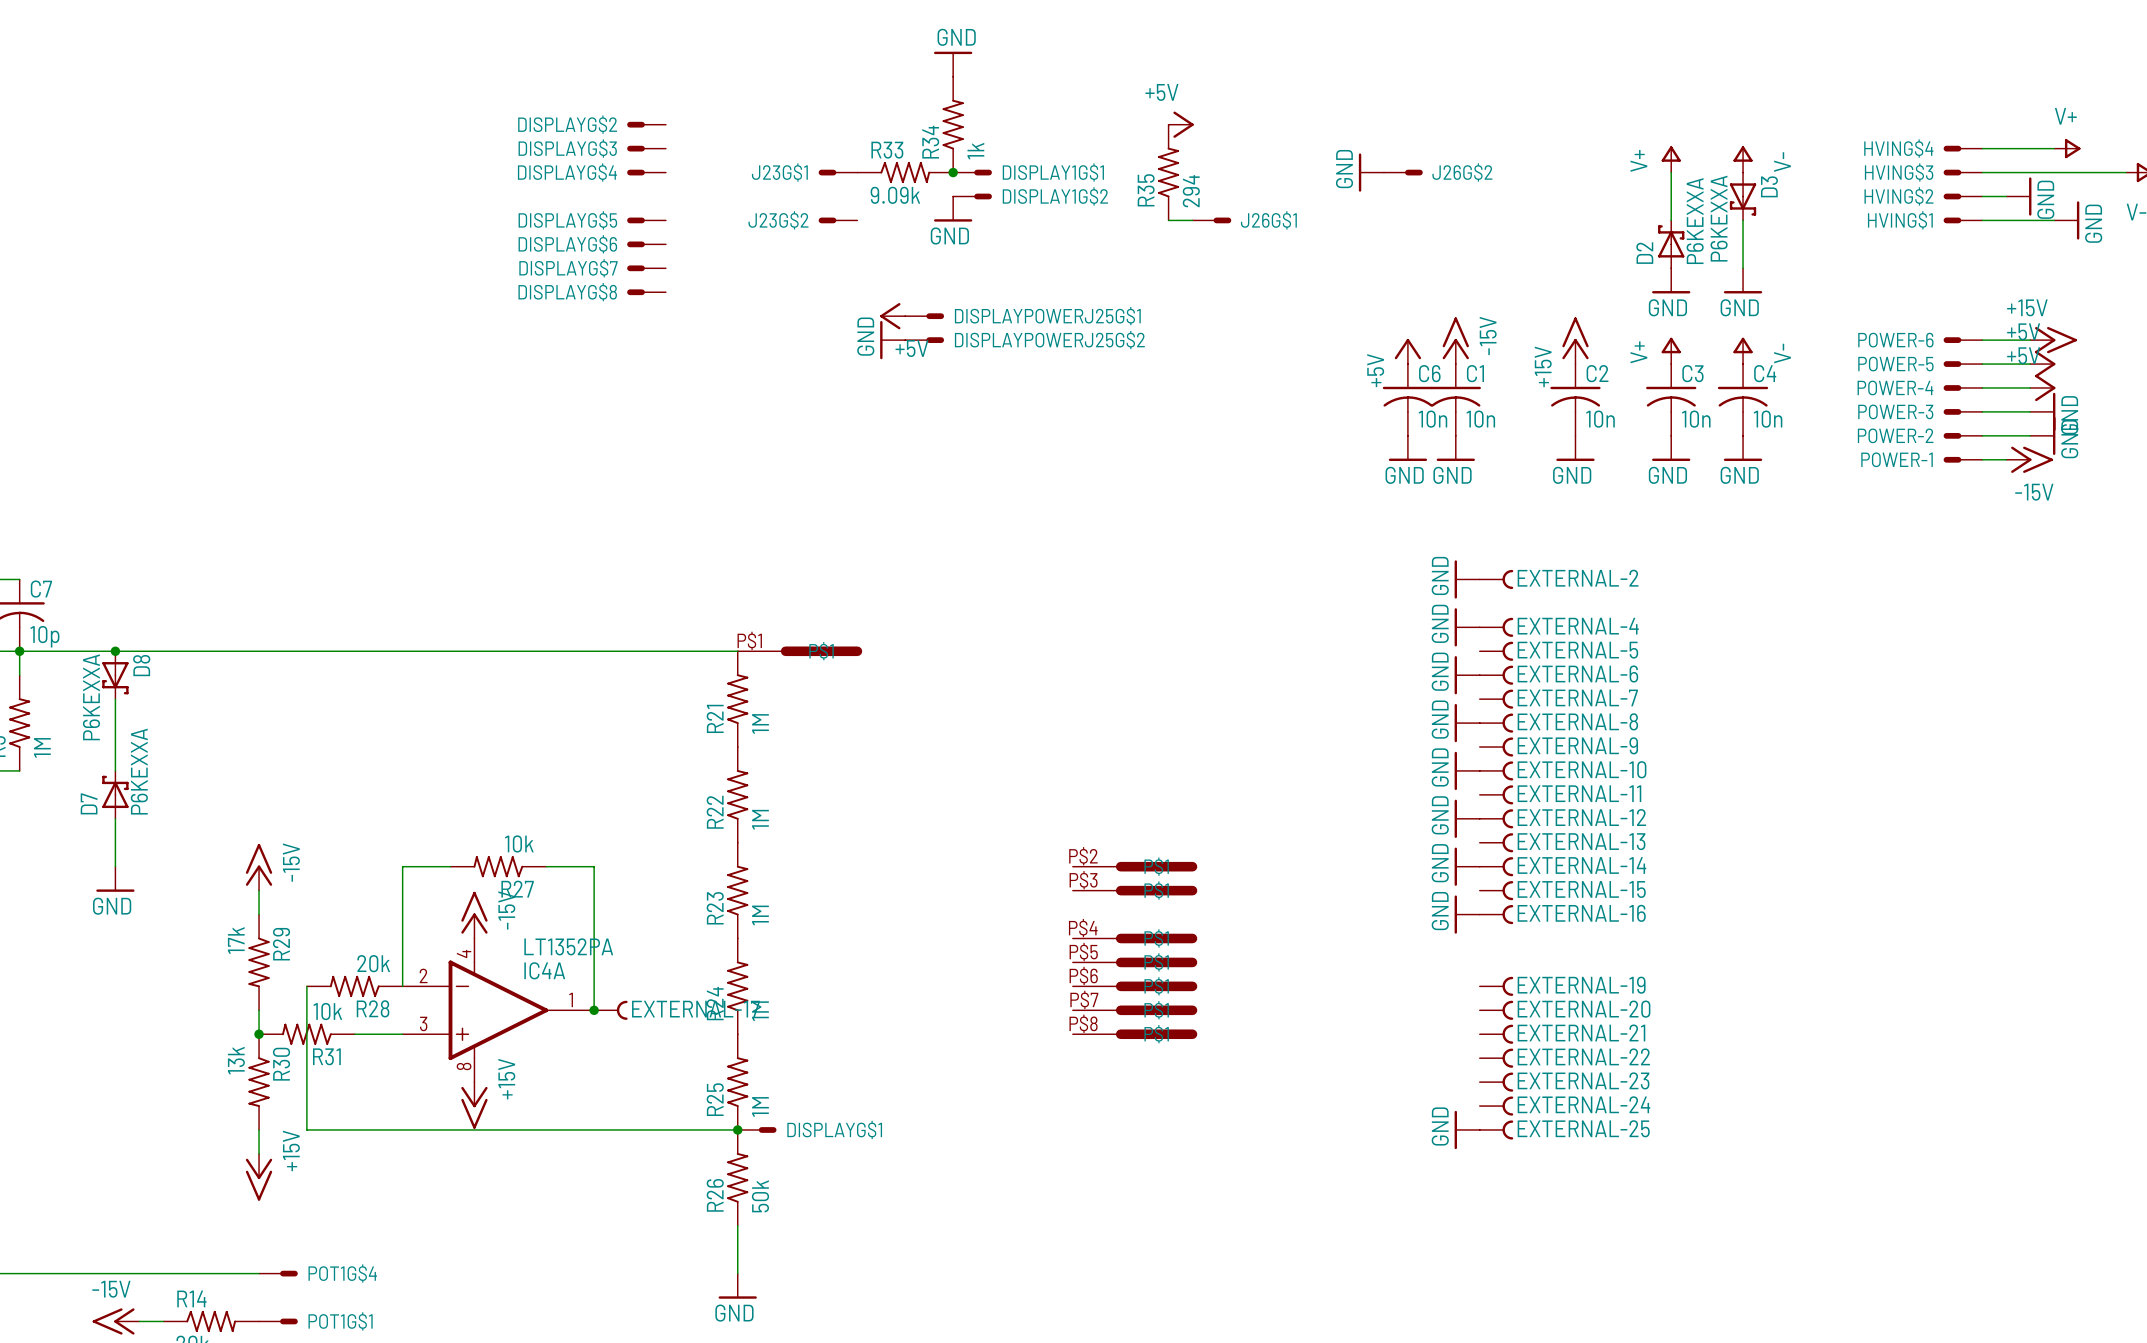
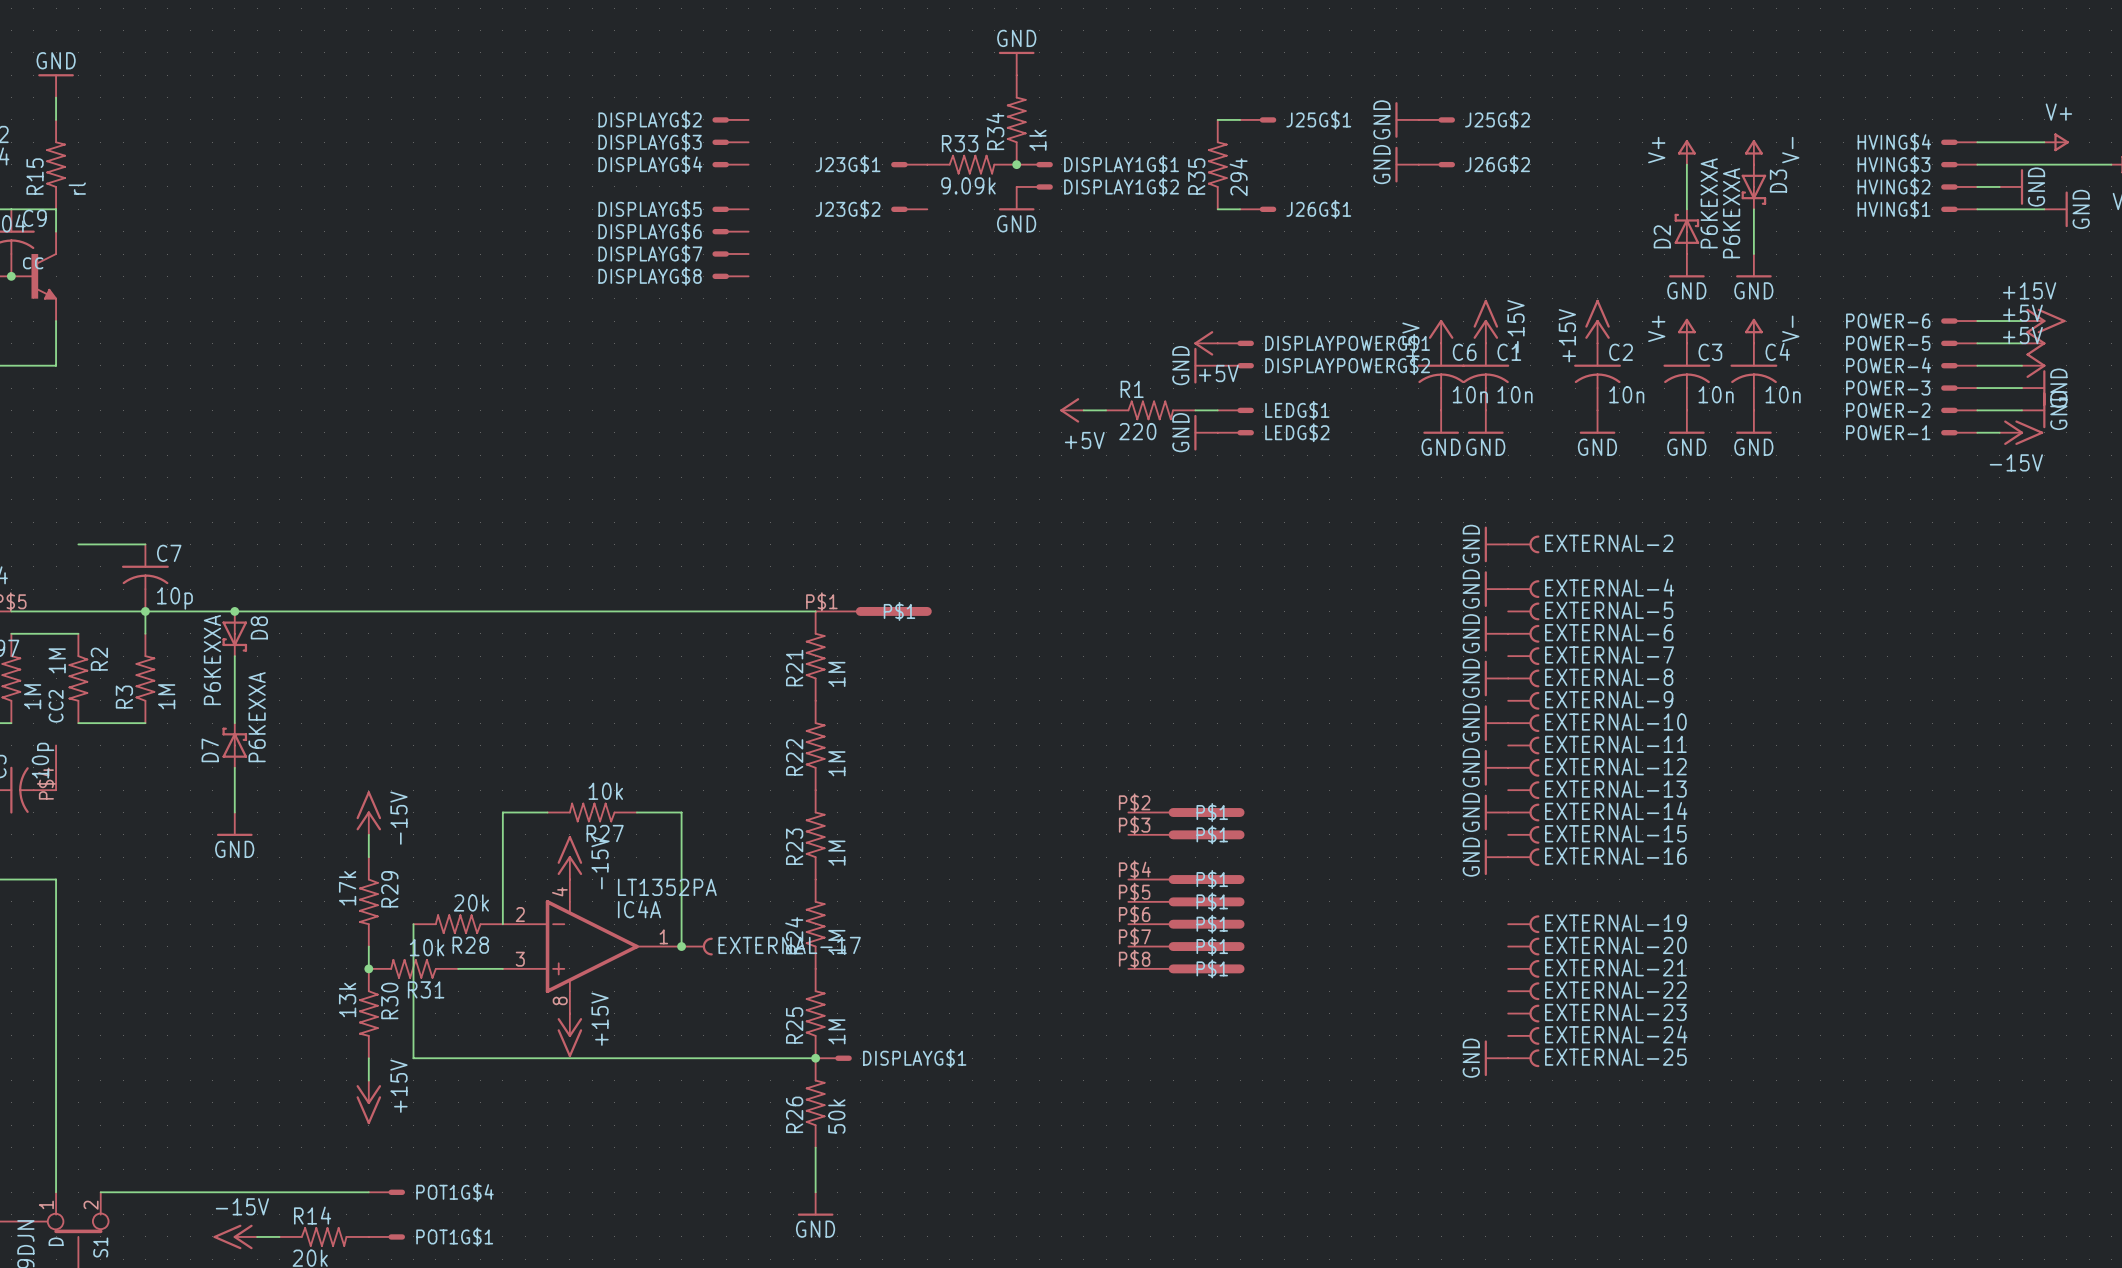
power symbol: +5V (1181, 124) -> none
J25G$1: none -> (1258, 119)
power symbol: none -> GND (1407, 119)
J25G$2: none -> (1436, 119)
power symbol: +5V (892, 316) -> none
DISPLAYPOWERJ25G$1: (924, 316) -> none
power symbol: GND (892, 340) -> none
DISPLAYPOWERJ25G$2: (924, 340) -> none
power symbol: none -> +5V (1206, 343)
DISPLAYPOWERG$1: none -> (1235, 343)
power symbol: none -> GND (1206, 365)
DISPLAYPOWERG$2: none -> (1235, 365)
power symbol: none -> +5V (1071, 410)
wire: none -> (1083, 410) (1106, 410)
R1: none -> 220 (1150, 410)
wire: none -> (1195, 410) (1217, 410)
LEDG$1: none -> (1235, 410)
power symbol: none -> GND (1206, 432)
LEDG$2: none -> (1235, 432)

